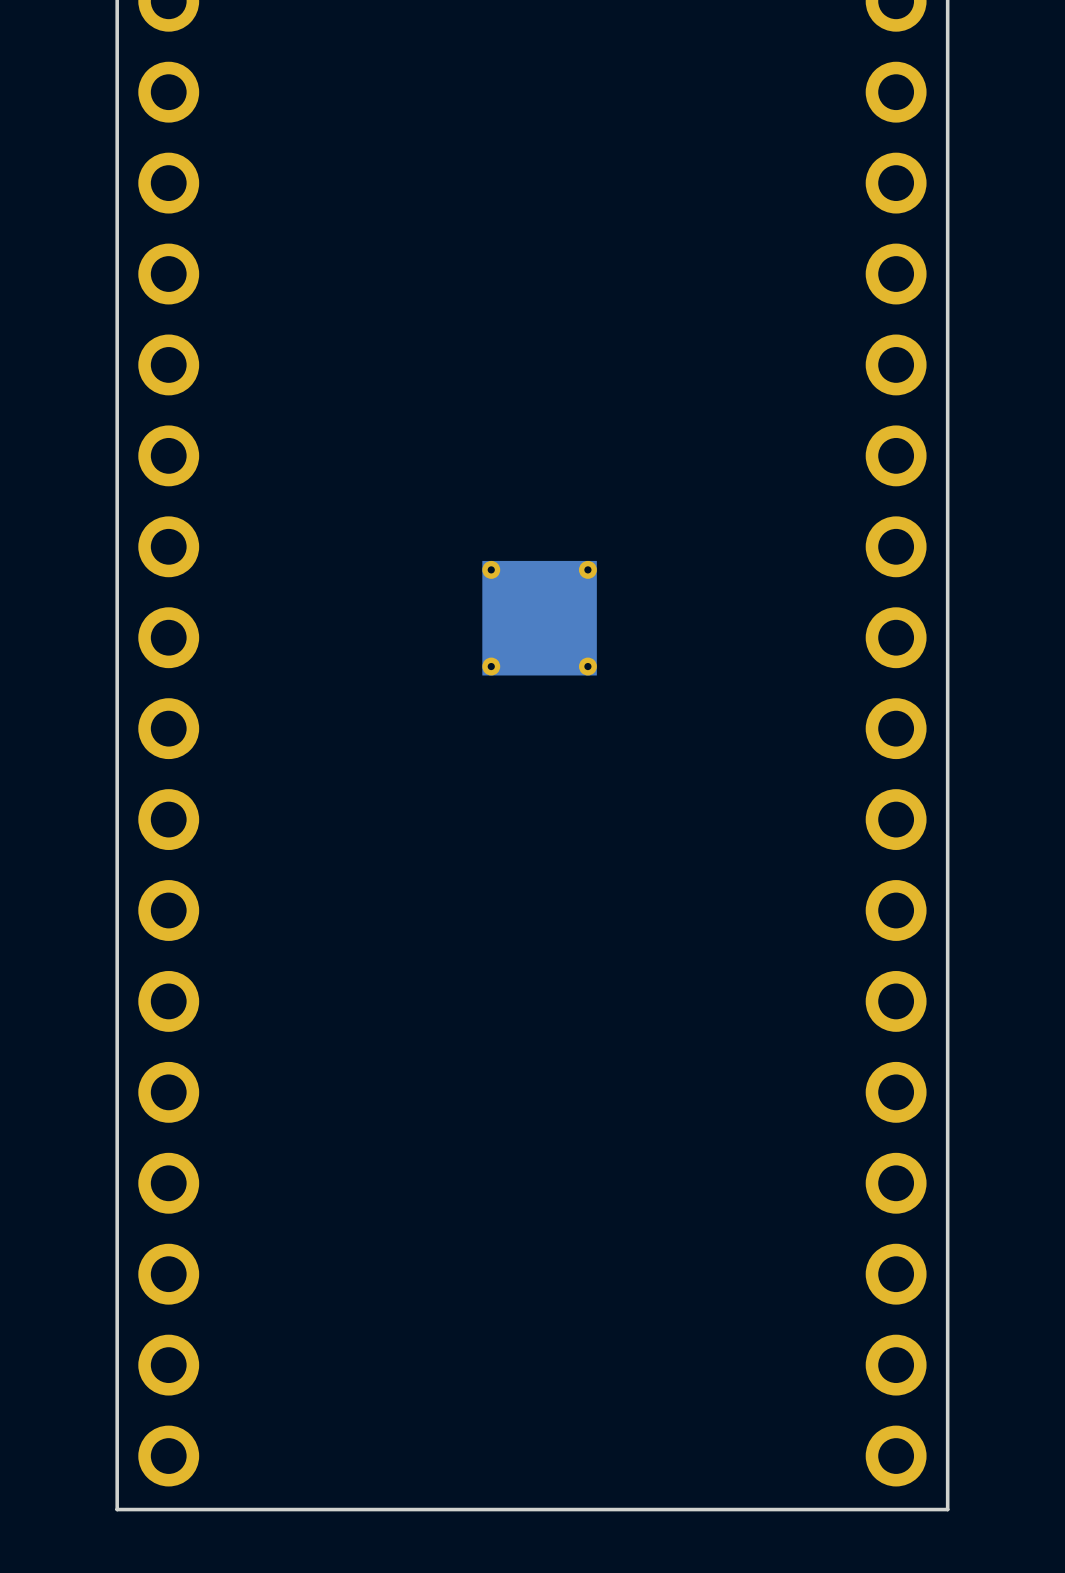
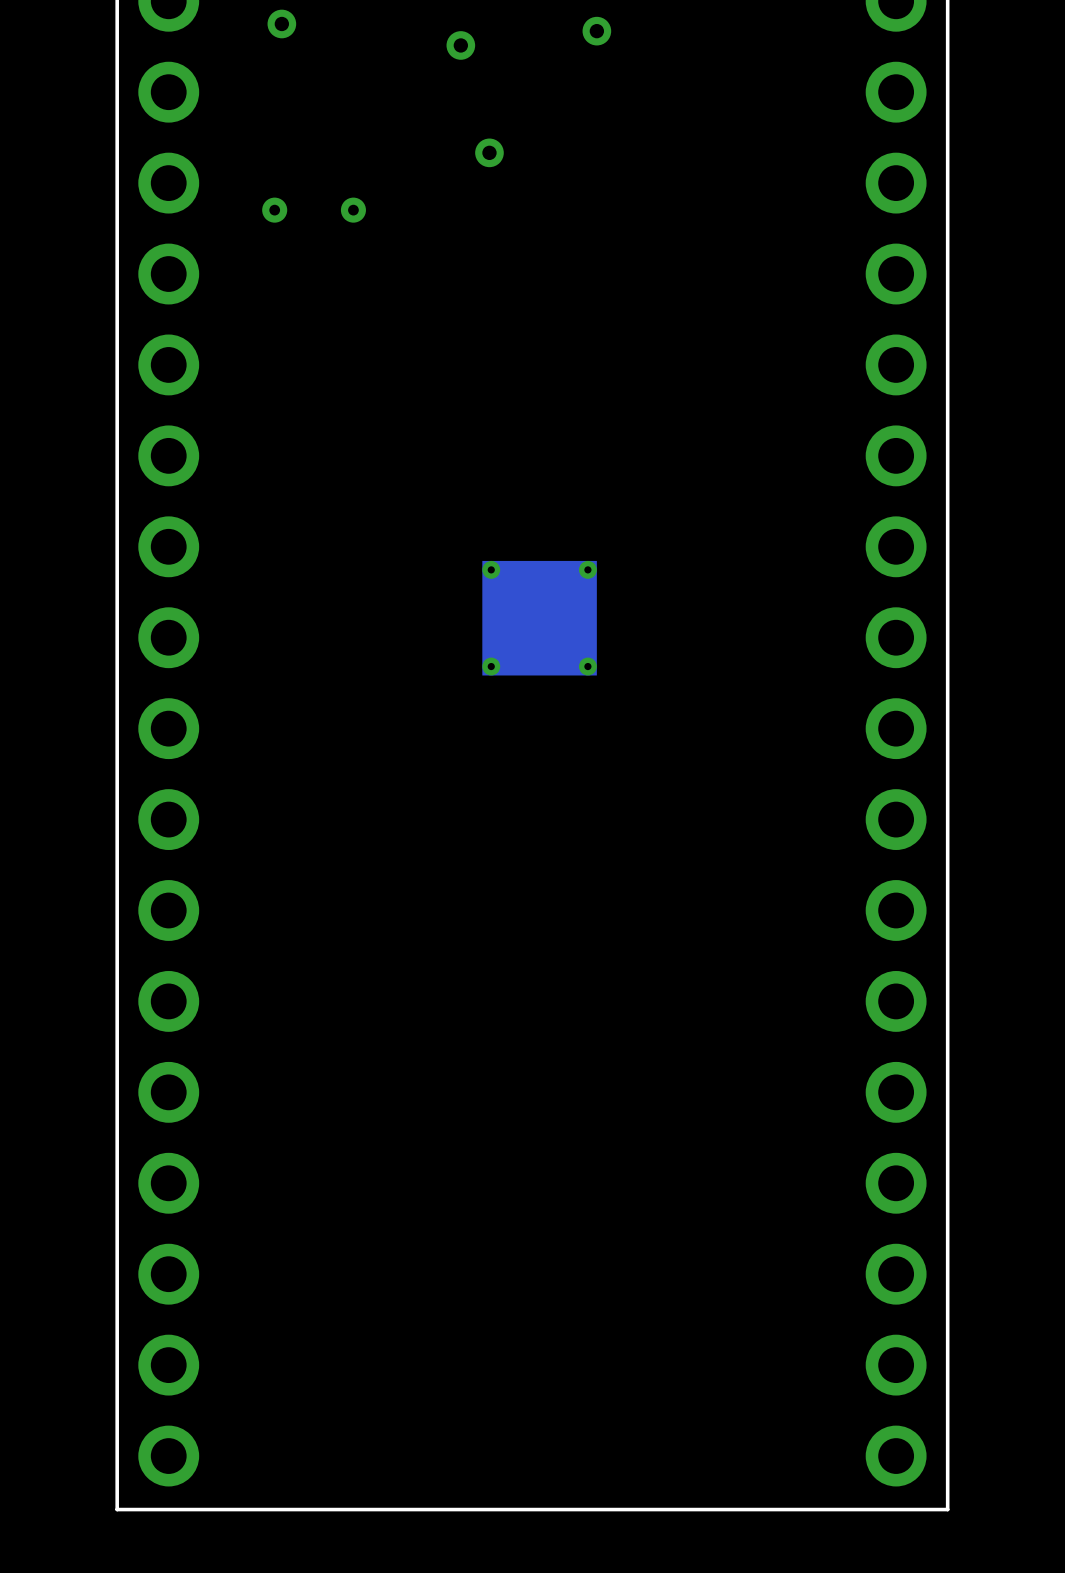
via: none -> (281, 23)
via: none -> (596, 31)
via: none -> (460, 45)
via: none -> (489, 152)
via: none -> (274, 210)
via: none -> (353, 210)

